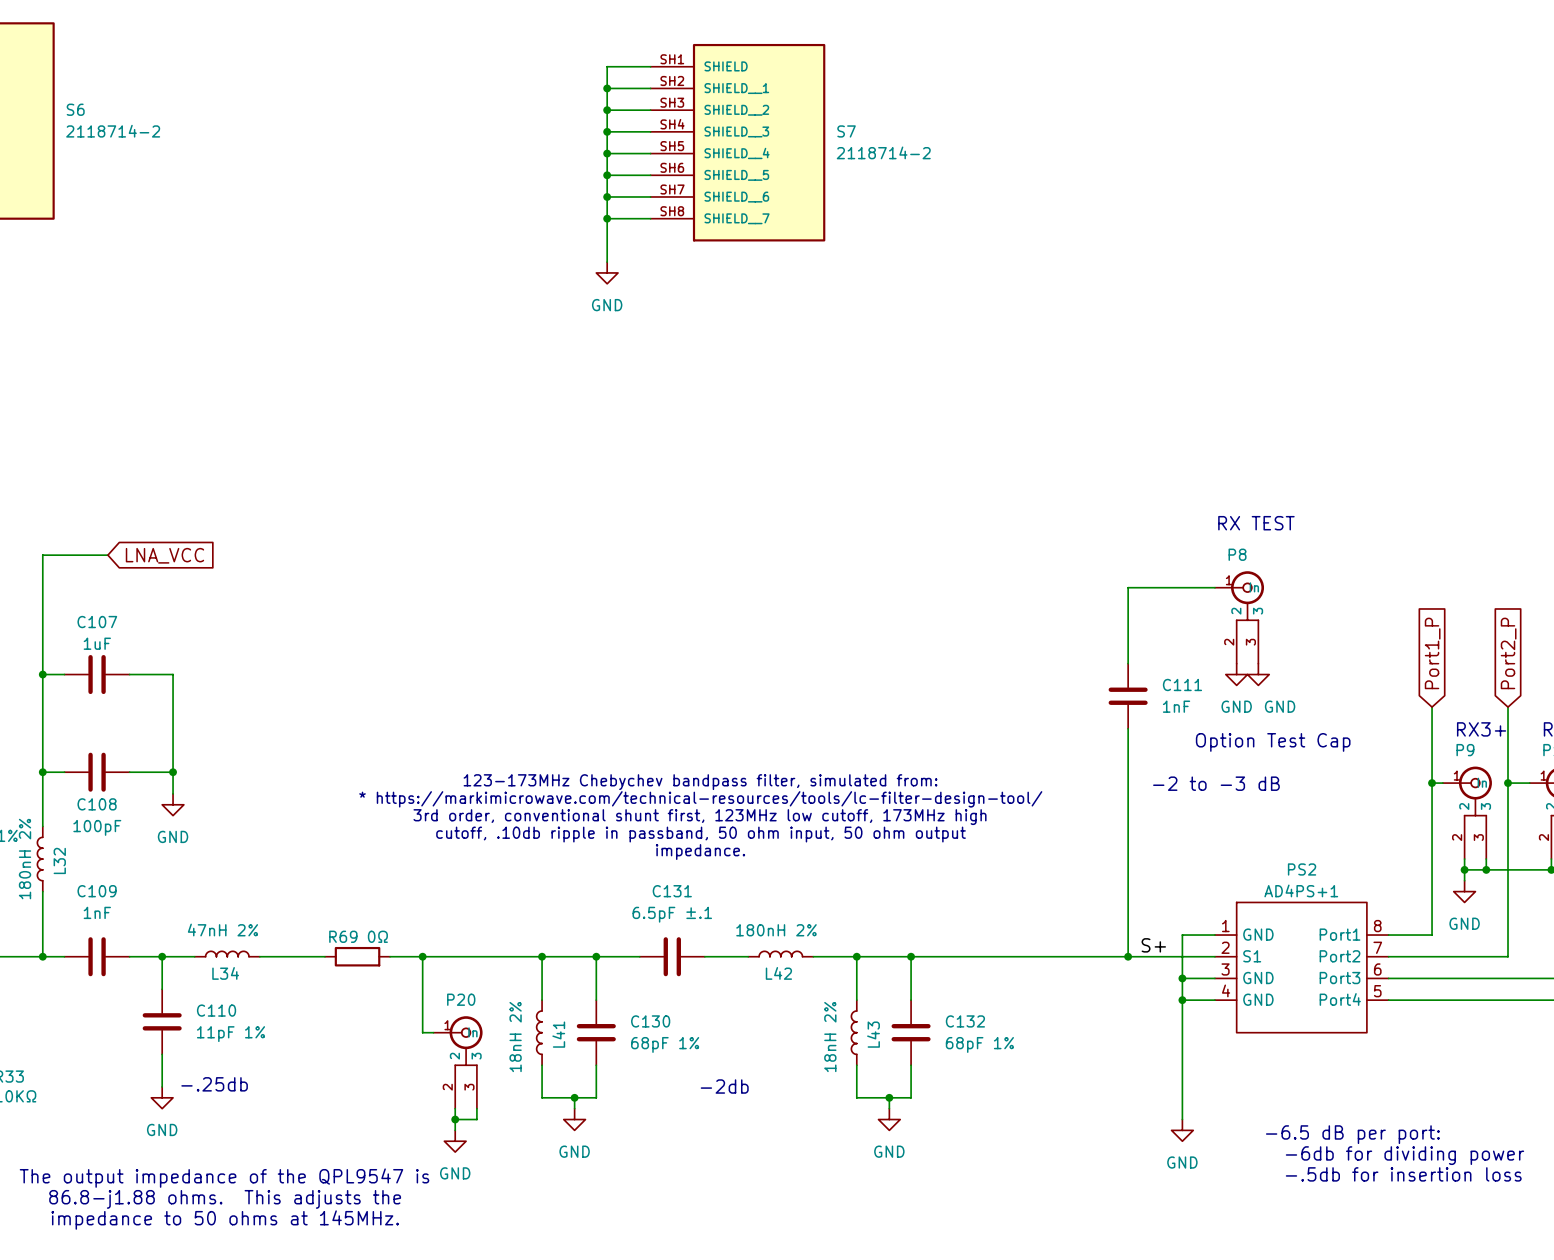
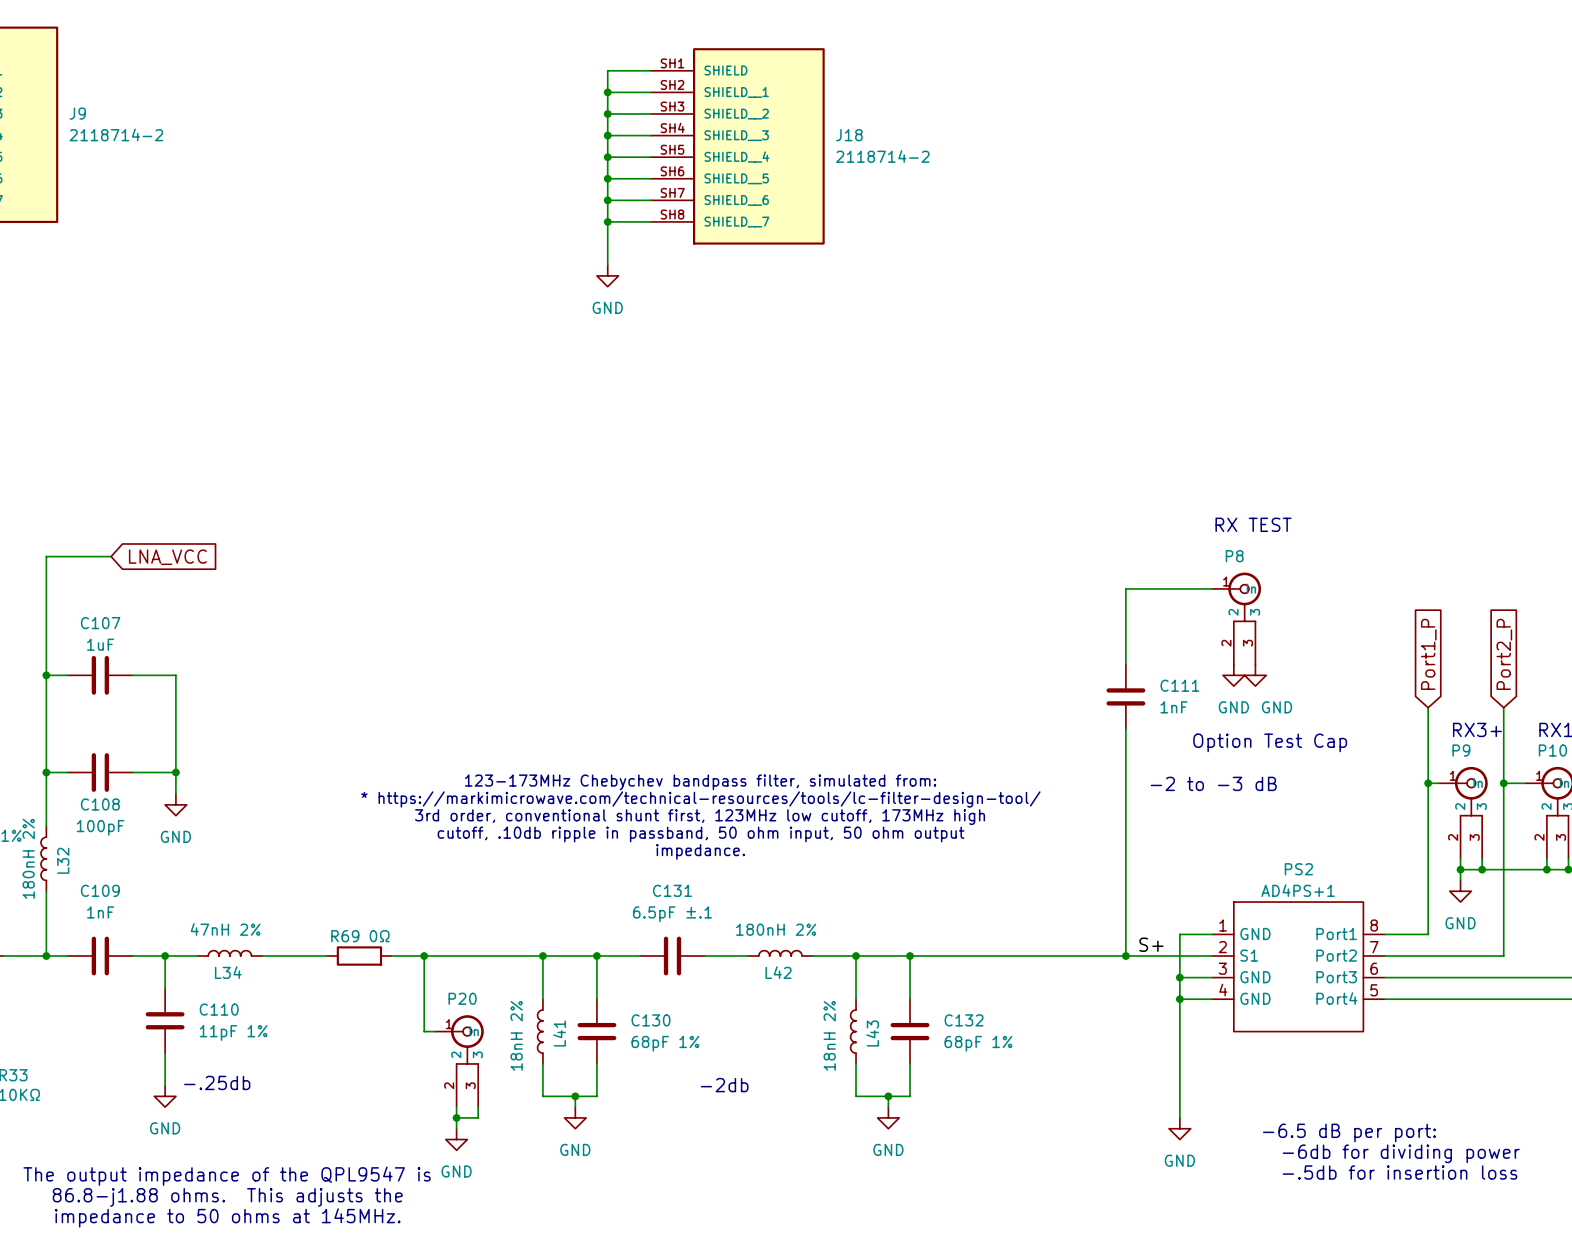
S6 name: S6 (75, 109) -> J9 (77, 113)
S7 name: S7 (846, 131) -> J18 (849, 135)

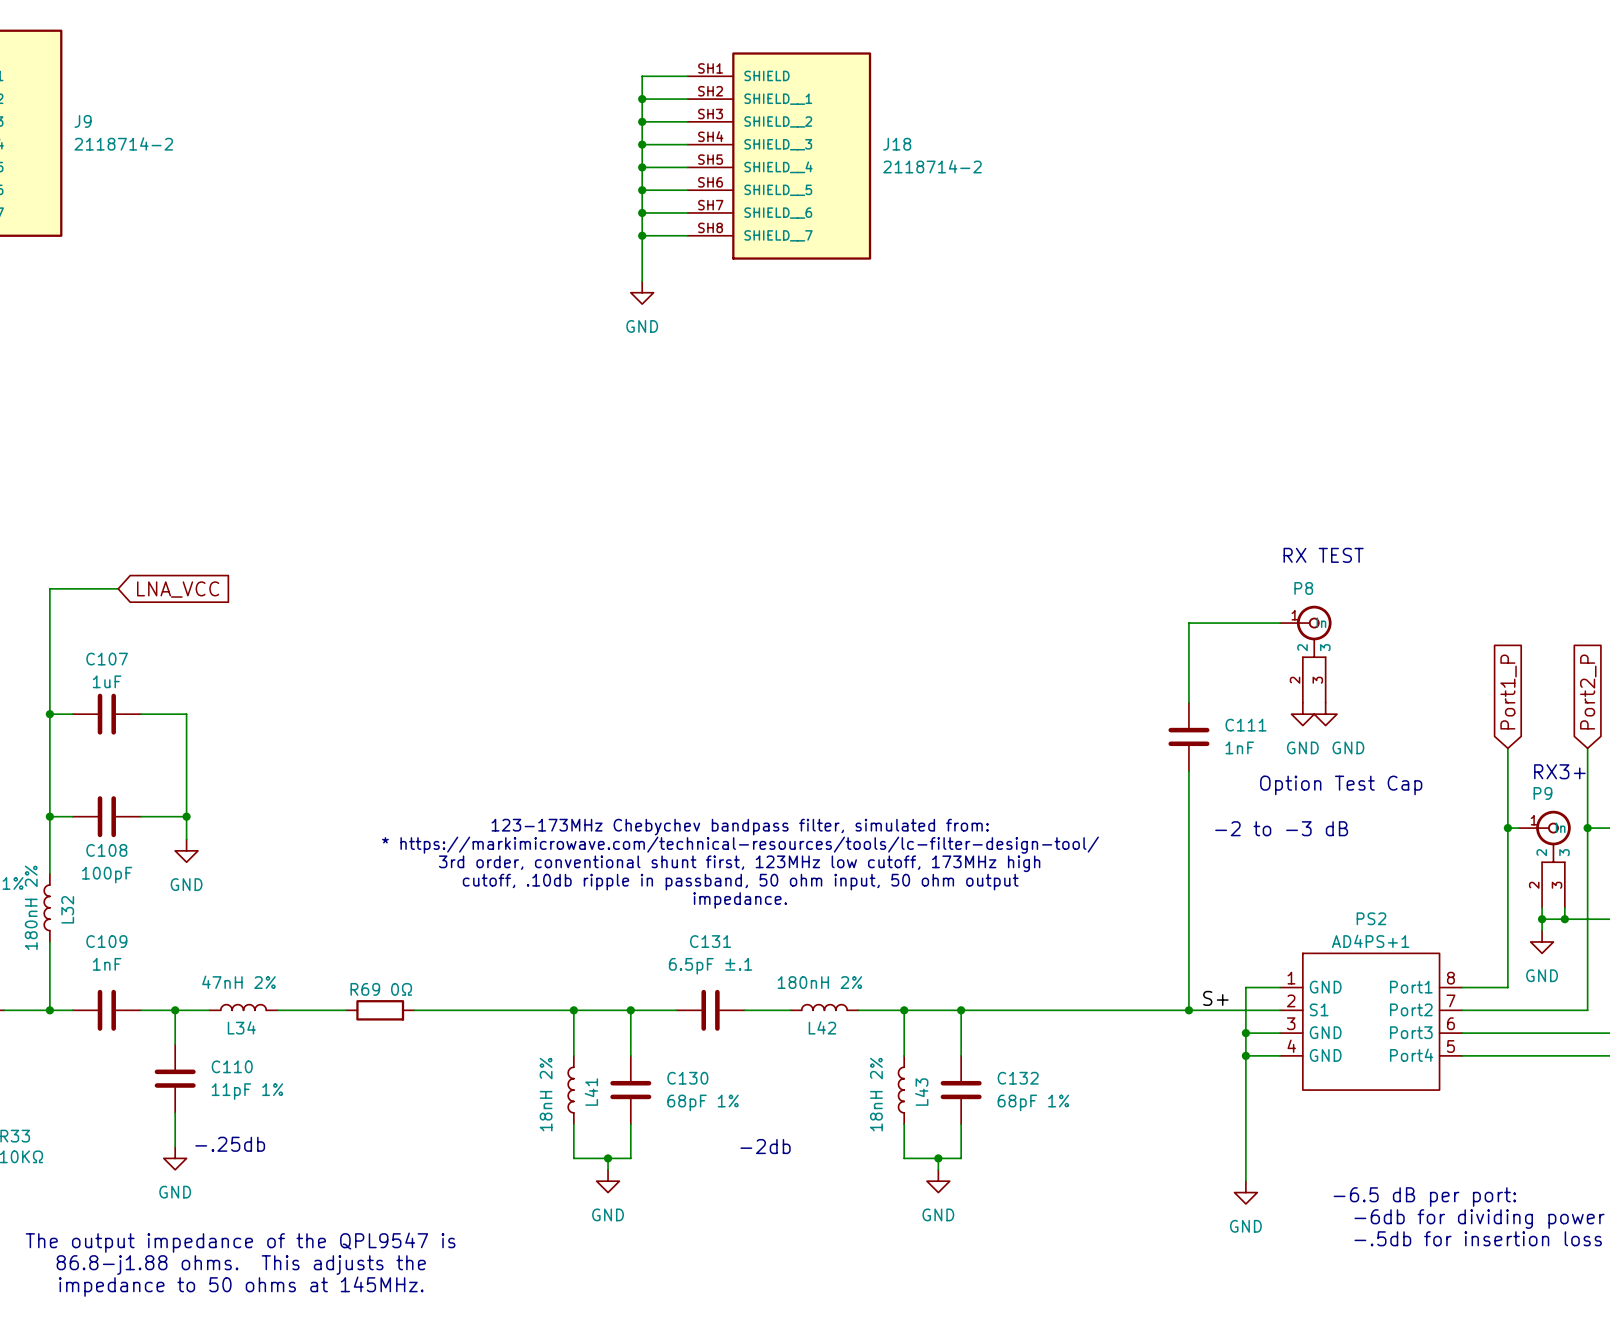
wire: (424, 956) (424, 1031) (435, 1031) -> none
junction: (424, 956) -> none
P20: (459, 1061) -> none
wire: (456, 1107) (456, 1128) -> none
wire: (478, 1107) (478, 1117) (456, 1117) -> none
junction: (456, 1117) -> none
power symbol: GND (456, 1139) -> none

